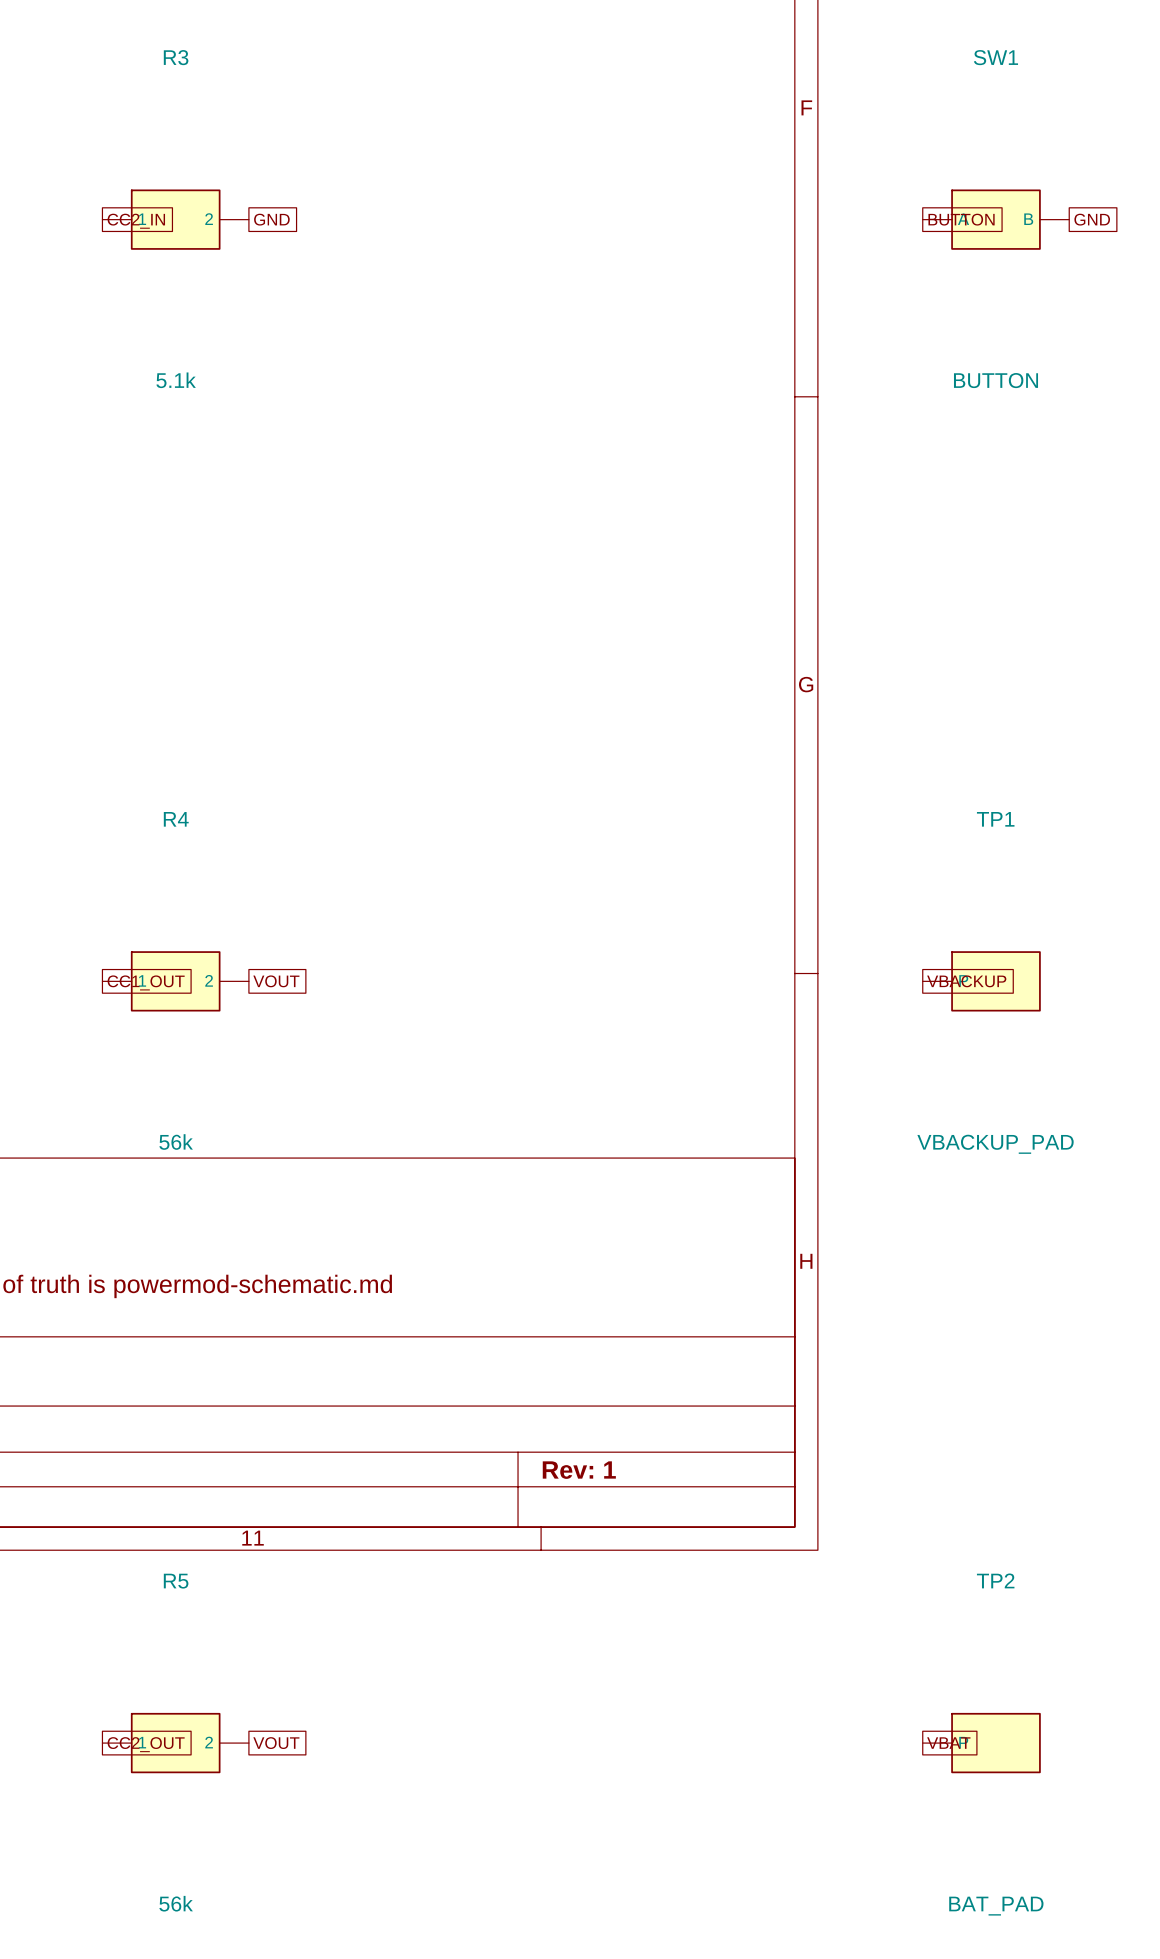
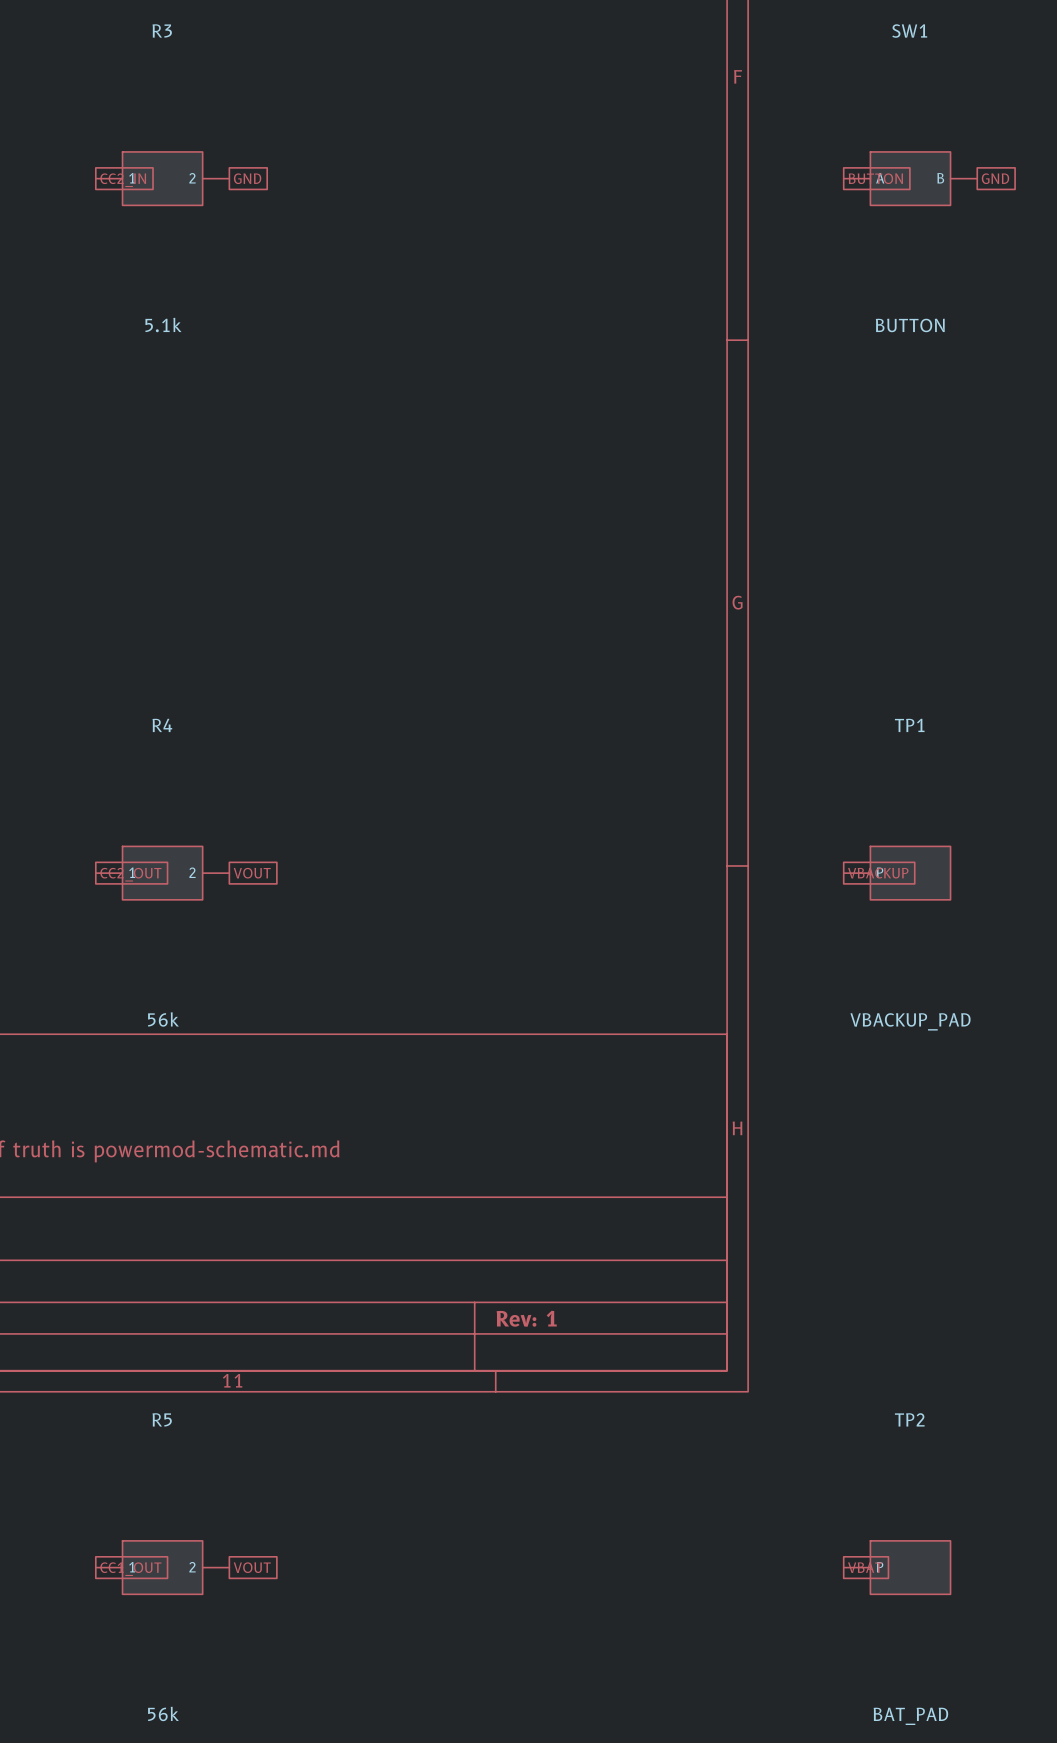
global label: CC1_OUT (146, 982) -> CC2_OUT (130, 874)
global label: CC2_OUT (146, 1744) -> CC1_OUT (130, 1569)

